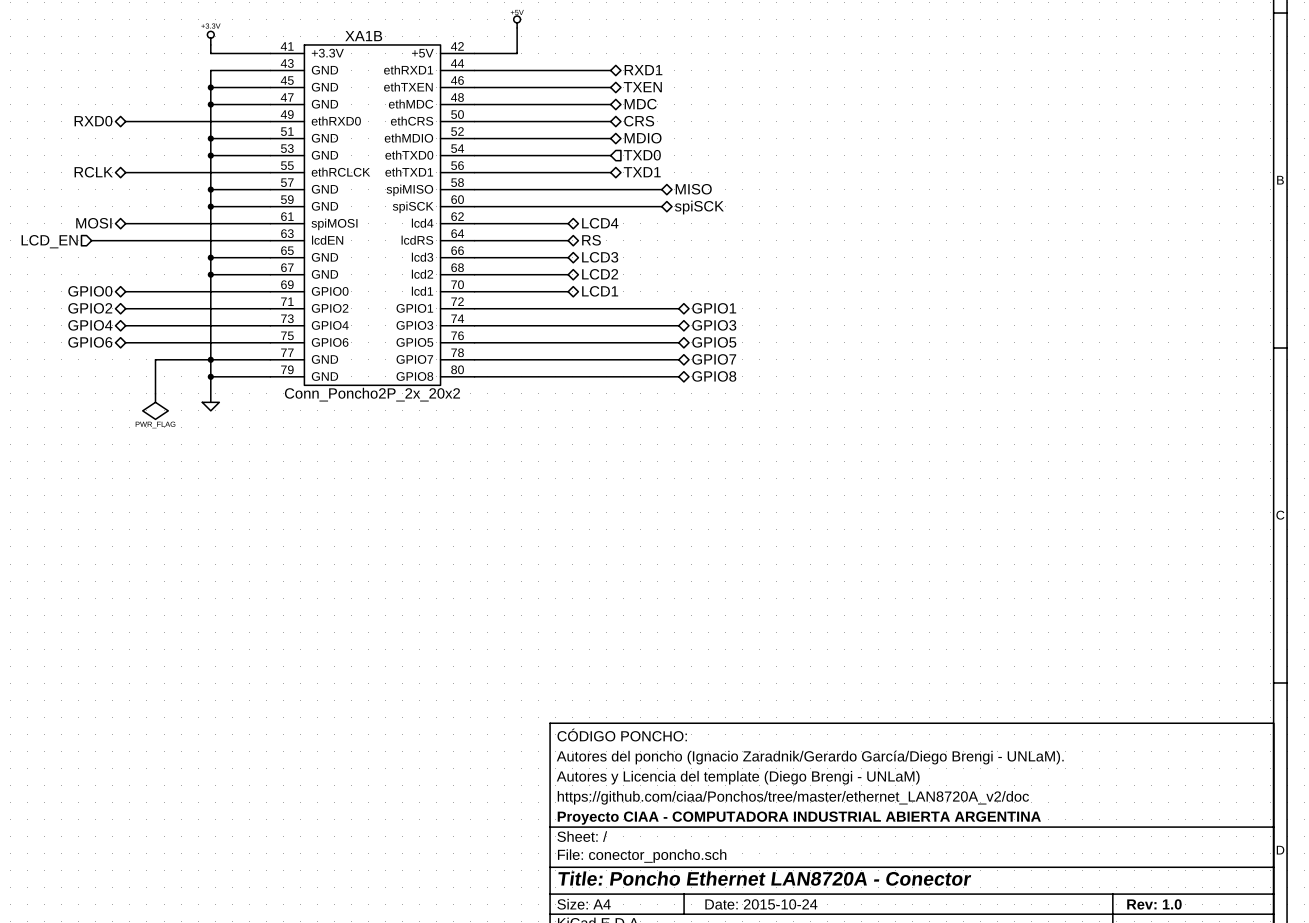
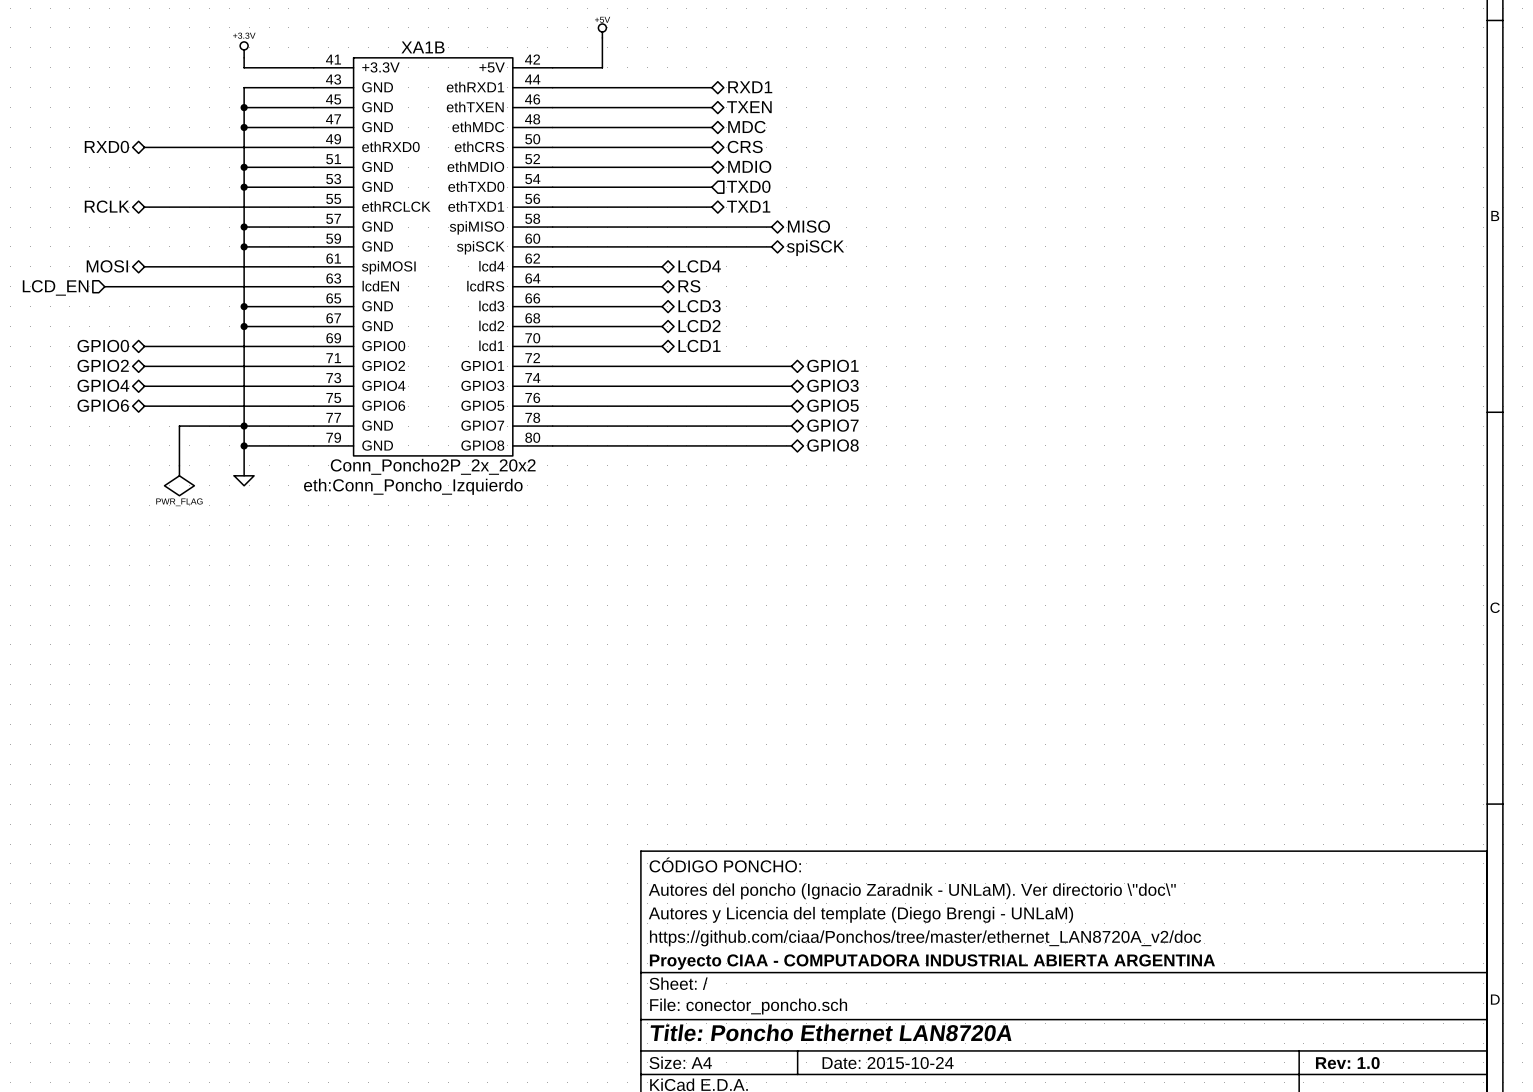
XA1B text: none -> eth:Conn_Poncho_Izquierdo (413, 486)
title block: Autores del poncho (Ignacio Zaradnik/Gerardo García/Diego Brengi - UNLaM). (810, 757) -> Autores del poncho (Ignacio Zaradnik - UNLaM). Ver directorio \"doc\" (912, 891)
title block: Title: Poncho Ethernet LAN8720A - Conector (764, 878) -> Title: Poncho Ethernet LAN8720A (831, 1032)

